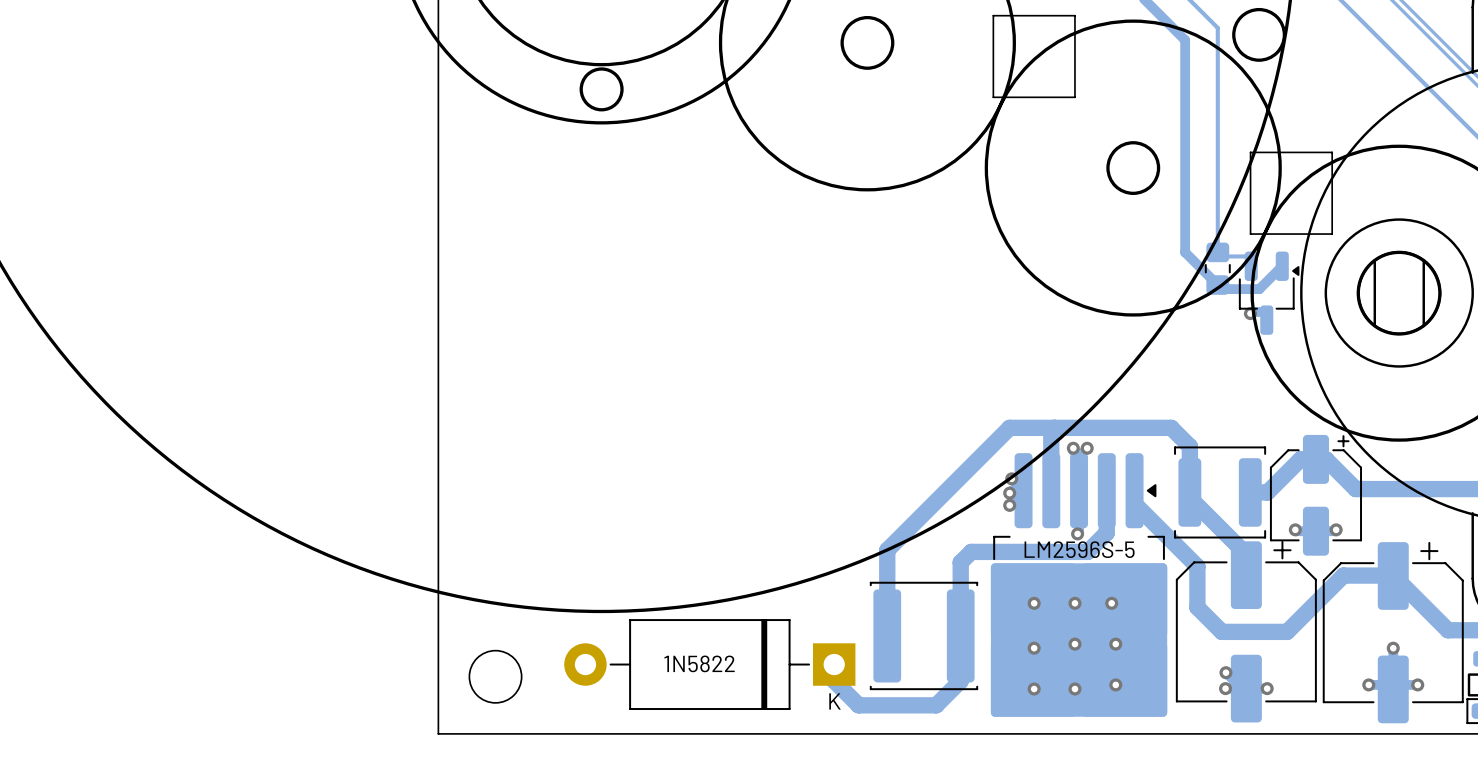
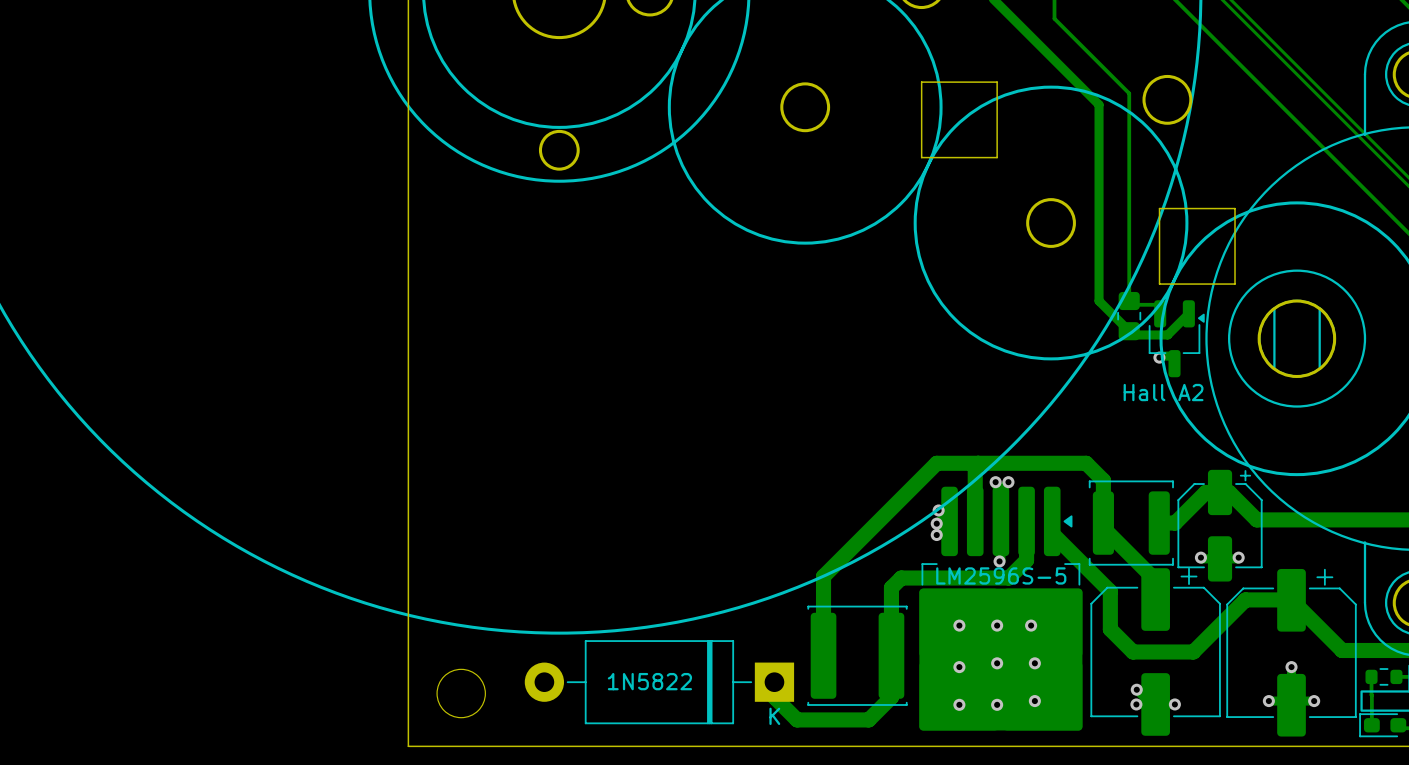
part value: none -> Hall A2 (1163, 392)

